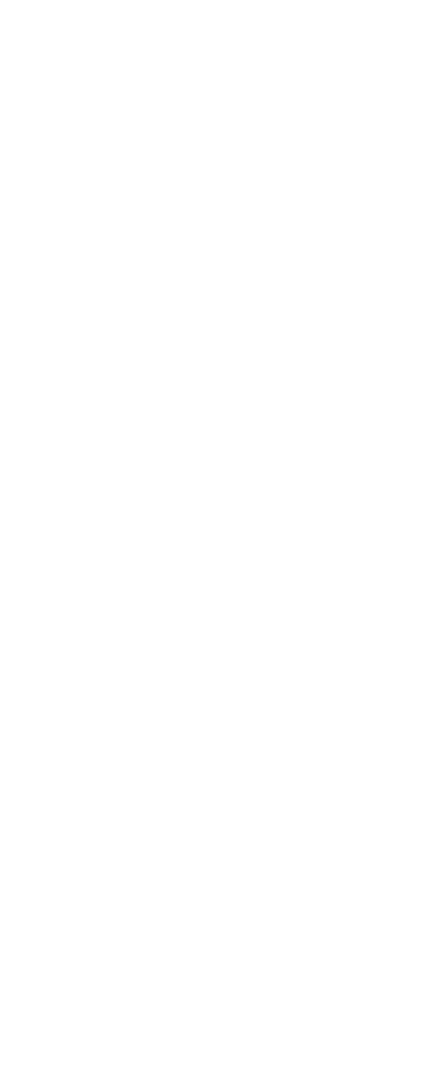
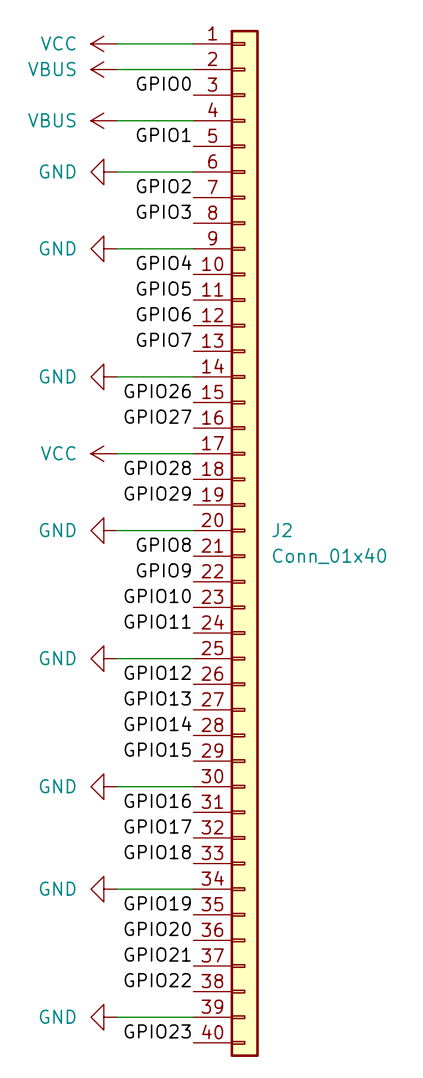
power symbol: none -> VCC (103, 43)
wire: none -> (116, 43) (193, 43)
power symbol: none -> VBUS (103, 69)
wire: none -> (116, 69) (193, 69)
label: none -> GPIO0 (163, 83)
power symbol: none -> VBUS (103, 120)
wire: none -> (116, 120) (193, 120)
label: none -> GPIO1 (163, 134)
power symbol: none -> GND (103, 171)
wire: none -> (116, 171) (193, 171)
label: none -> GPIO2 (163, 186)
label: none -> GPIO3 (163, 211)
power symbol: none -> GND (103, 248)
wire: none -> (116, 248) (193, 248)
label: none -> GPIO4 (164, 262)
label: none -> GPIO5 (163, 288)
label: none -> GPIO6 (163, 314)
label: none -> GPIO7 (164, 339)
power symbol: none -> GND (103, 376)
wire: none -> (116, 376) (193, 376)
label: none -> GPIO26 (157, 391)
label: none -> GPIO27 (158, 416)
power symbol: none -> VCC (103, 453)
wire: none -> (116, 453) (193, 453)
label: none -> GPIO28 (157, 467)
label: none -> GPIO29 (157, 493)
power symbol: none -> GND (103, 530)
wire: none -> (116, 530) (193, 530)
J2: none -> Conn_01x40 (226, 543)
label: none -> GPIO8 (163, 544)
label: none -> GPIO9 (163, 570)
label: none -> GPIO10 (157, 595)
label: none -> GPIO11 (157, 621)
power symbol: none -> GND (103, 658)
wire: none -> (116, 658) (193, 658)
label: none -> GPIO12 (157, 672)
label: none -> GPIO13 (157, 698)
label: none -> GPIO14 (158, 723)
label: none -> GPIO15 (157, 749)
power symbol: none -> GND (103, 786)
wire: none -> (116, 786) (193, 786)
label: none -> GPIO16 (157, 800)
label: none -> GPIO17 (158, 826)
label: none -> GPIO18 (157, 852)
power symbol: none -> GND (103, 889)
wire: none -> (116, 889) (193, 889)
label: none -> GPIO19 (157, 903)
label: none -> GPIO20 (157, 928)
label: none -> GPIO21 (157, 954)
label: none -> GPIO22 (157, 980)
power symbol: none -> GND (103, 1017)
wire: none -> (116, 1017) (193, 1017)
label: none -> GPIO23 (157, 1031)

